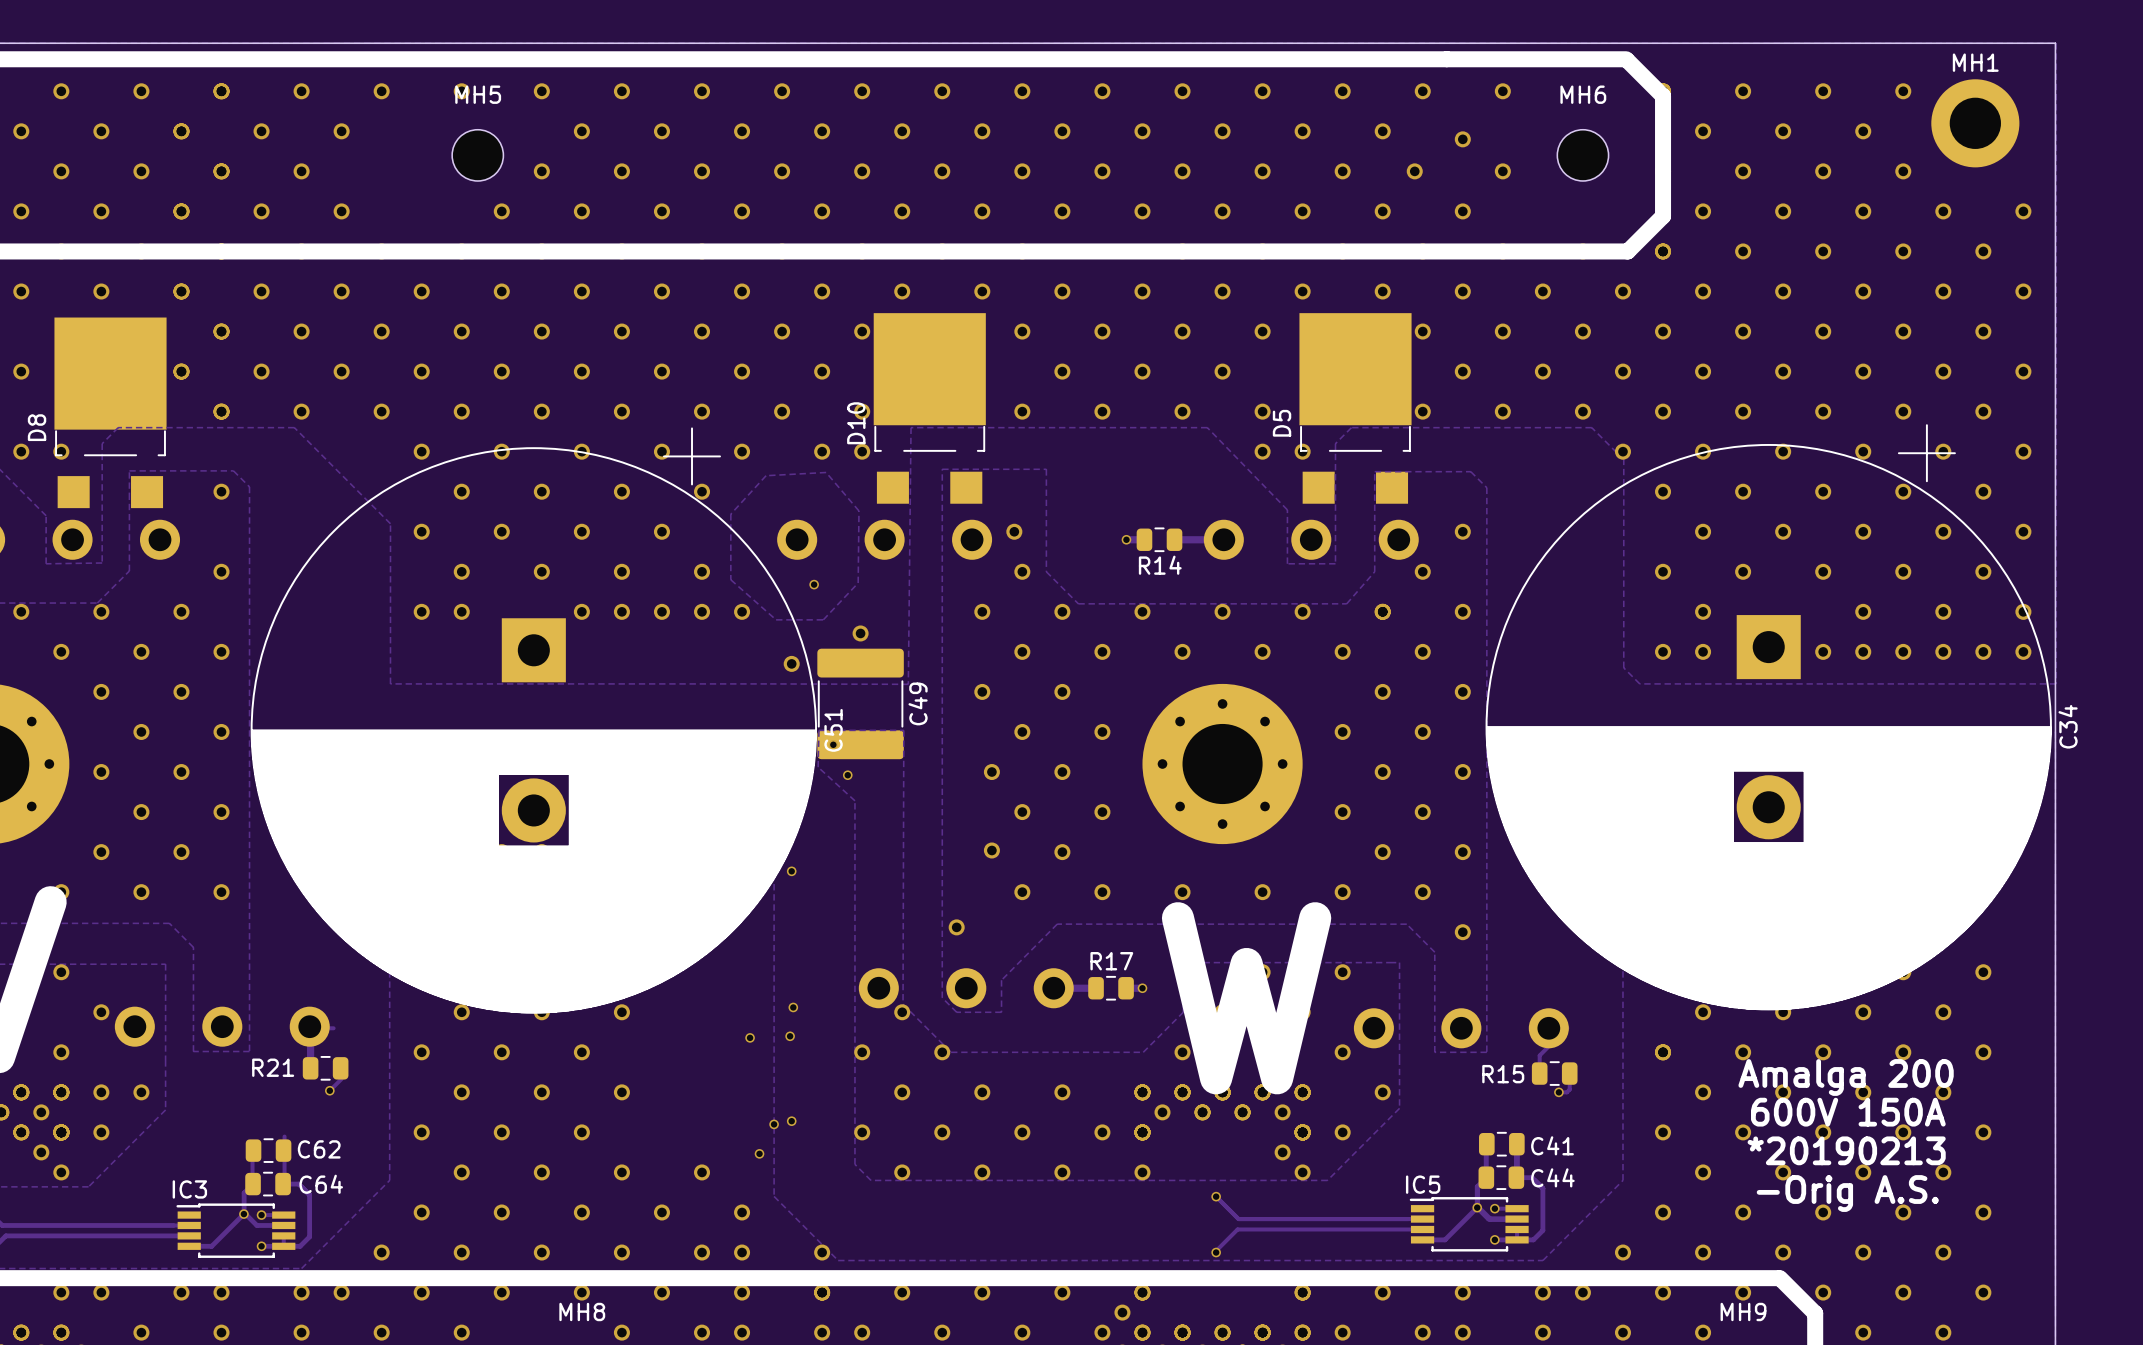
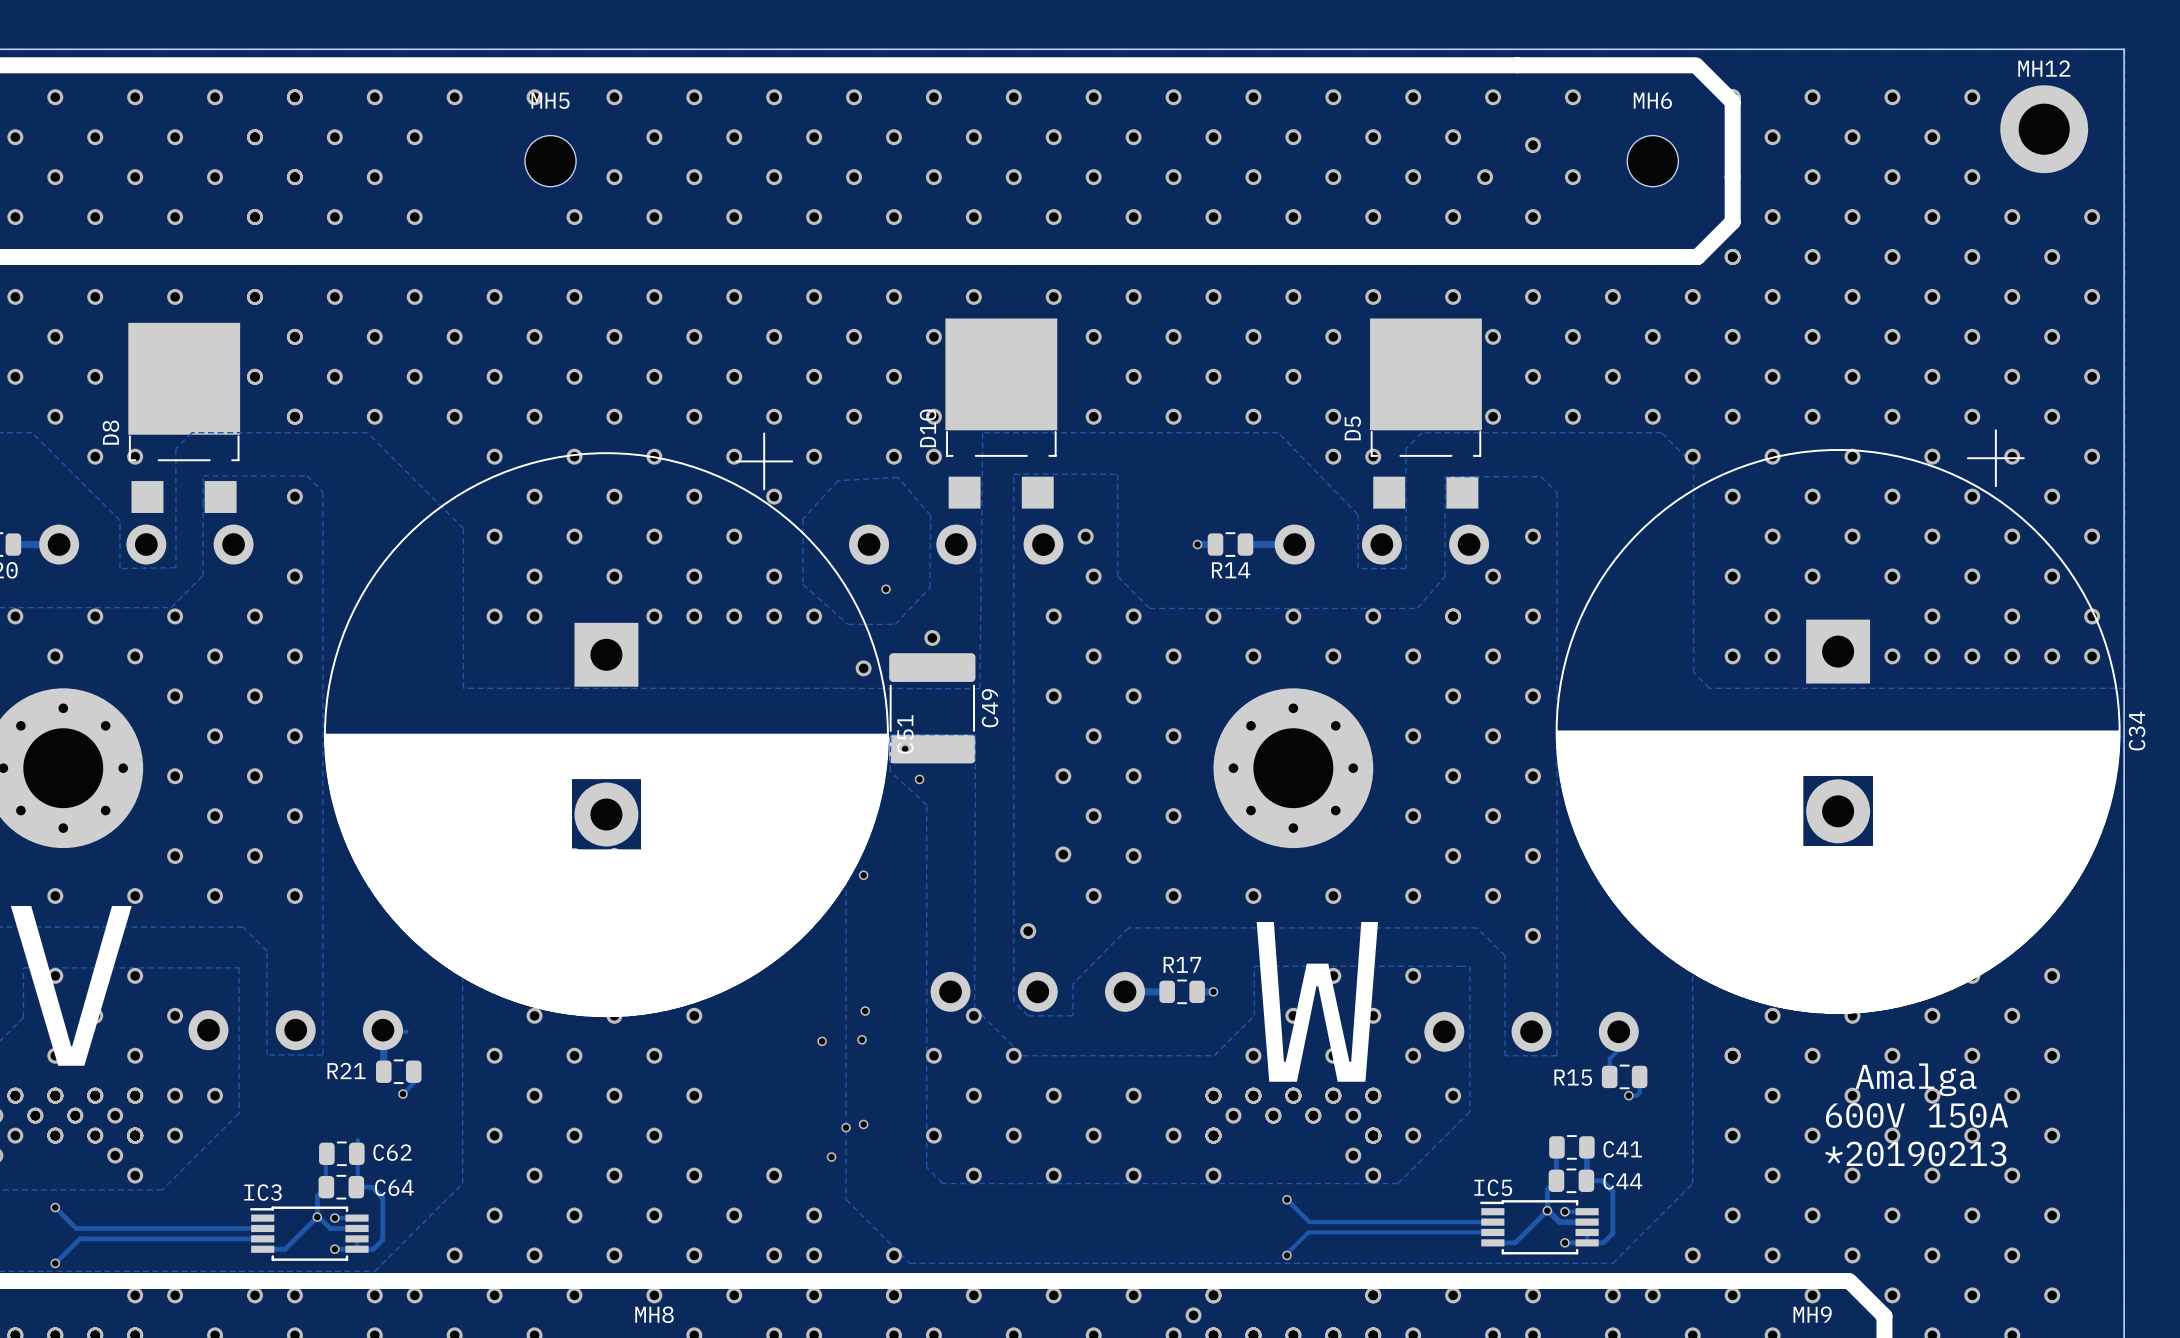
MH1 name: MH1 (1975, 62) -> MH12 (2044, 68)
text: Amalga 200 (1846, 1077) -> Amalga (1916, 1079)
text: -Orig A.S. (1847, 1193) -> none

